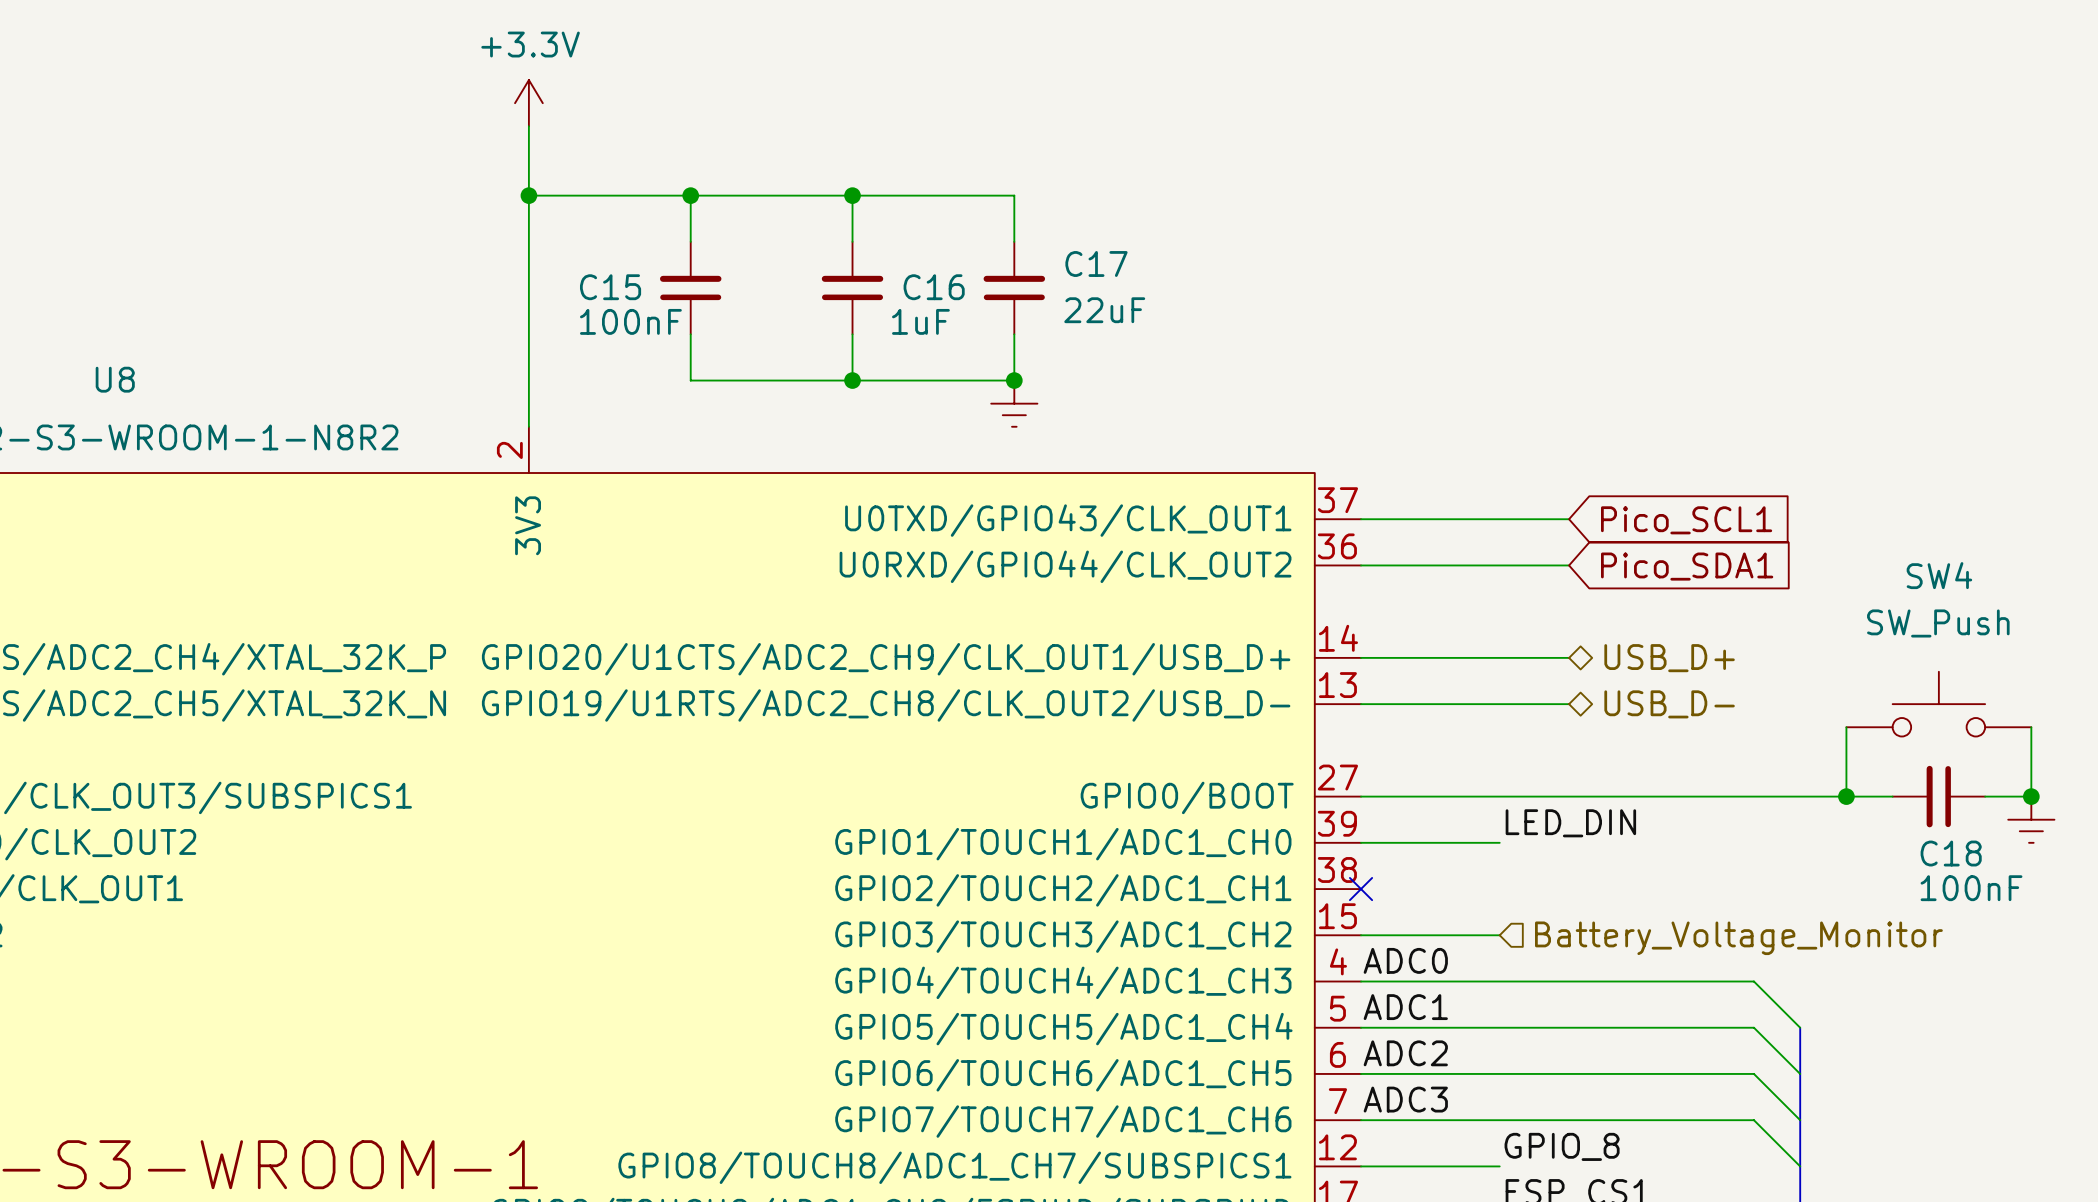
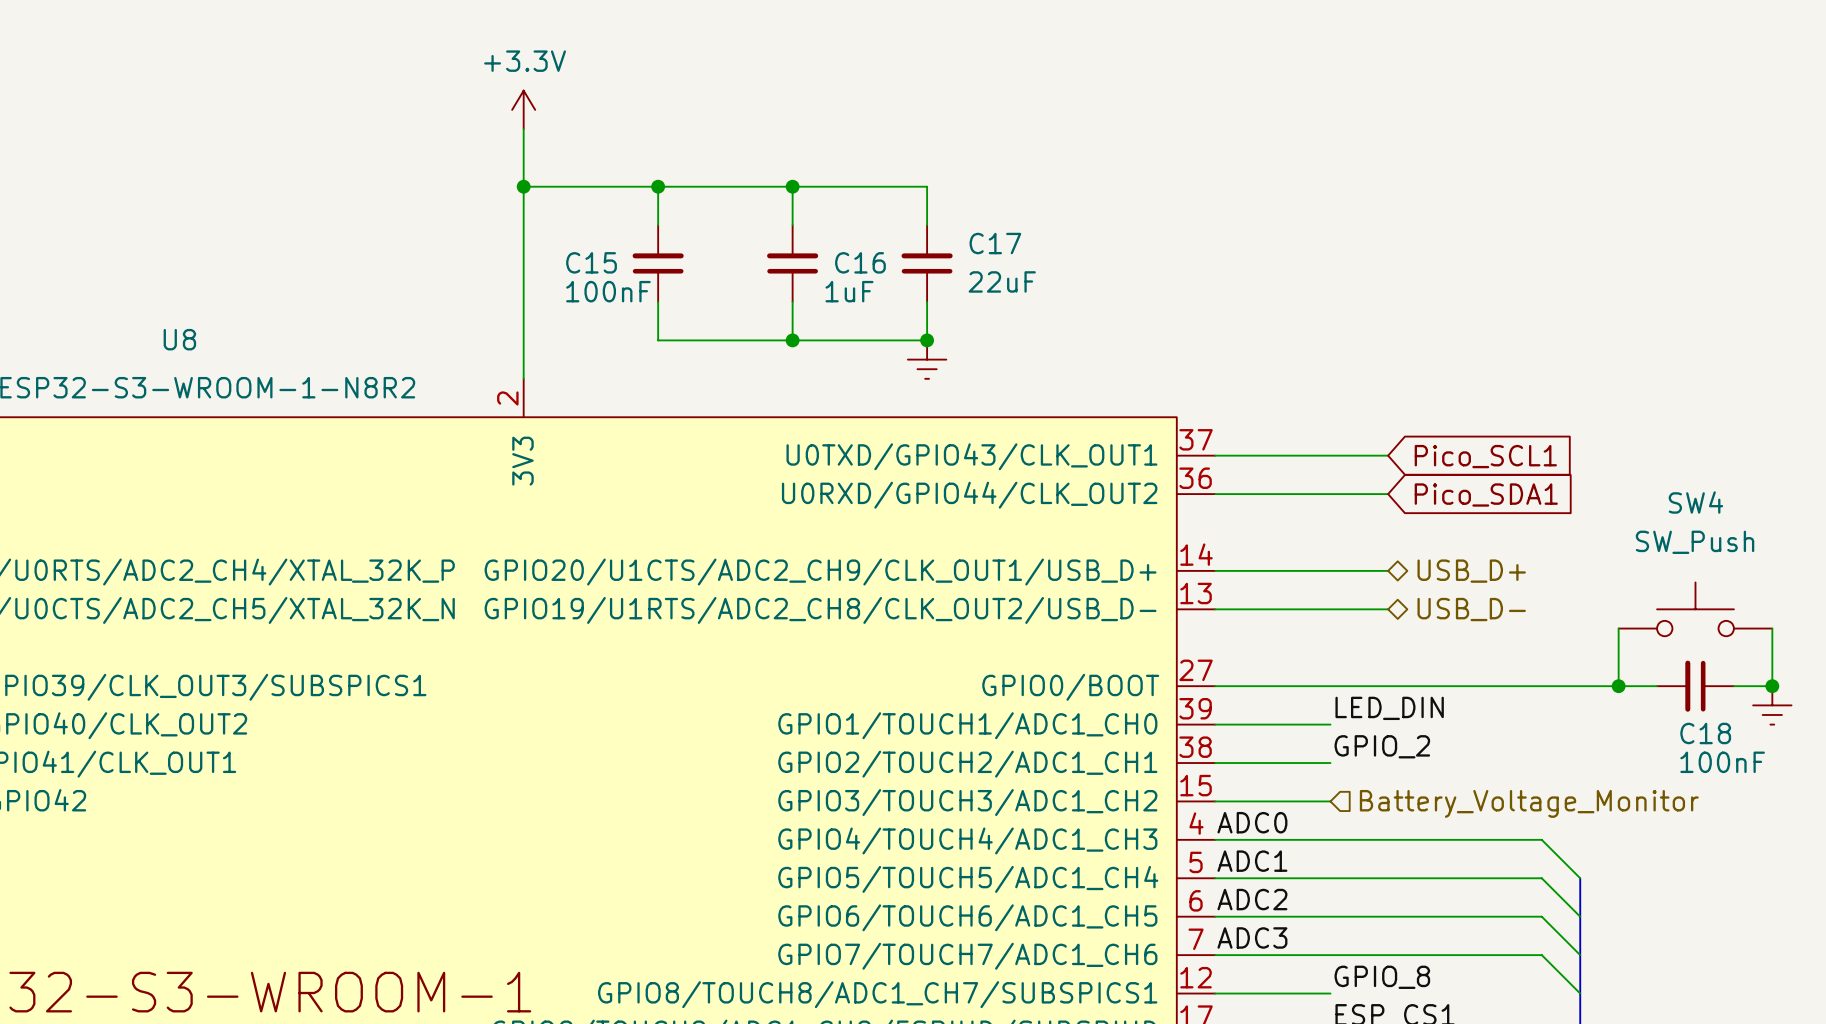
label: none -> GPIO_2 (1382, 746)
wire: none -> (1215, 763) (1330, 763)
no-connect mark: (1361, 889) -> none

